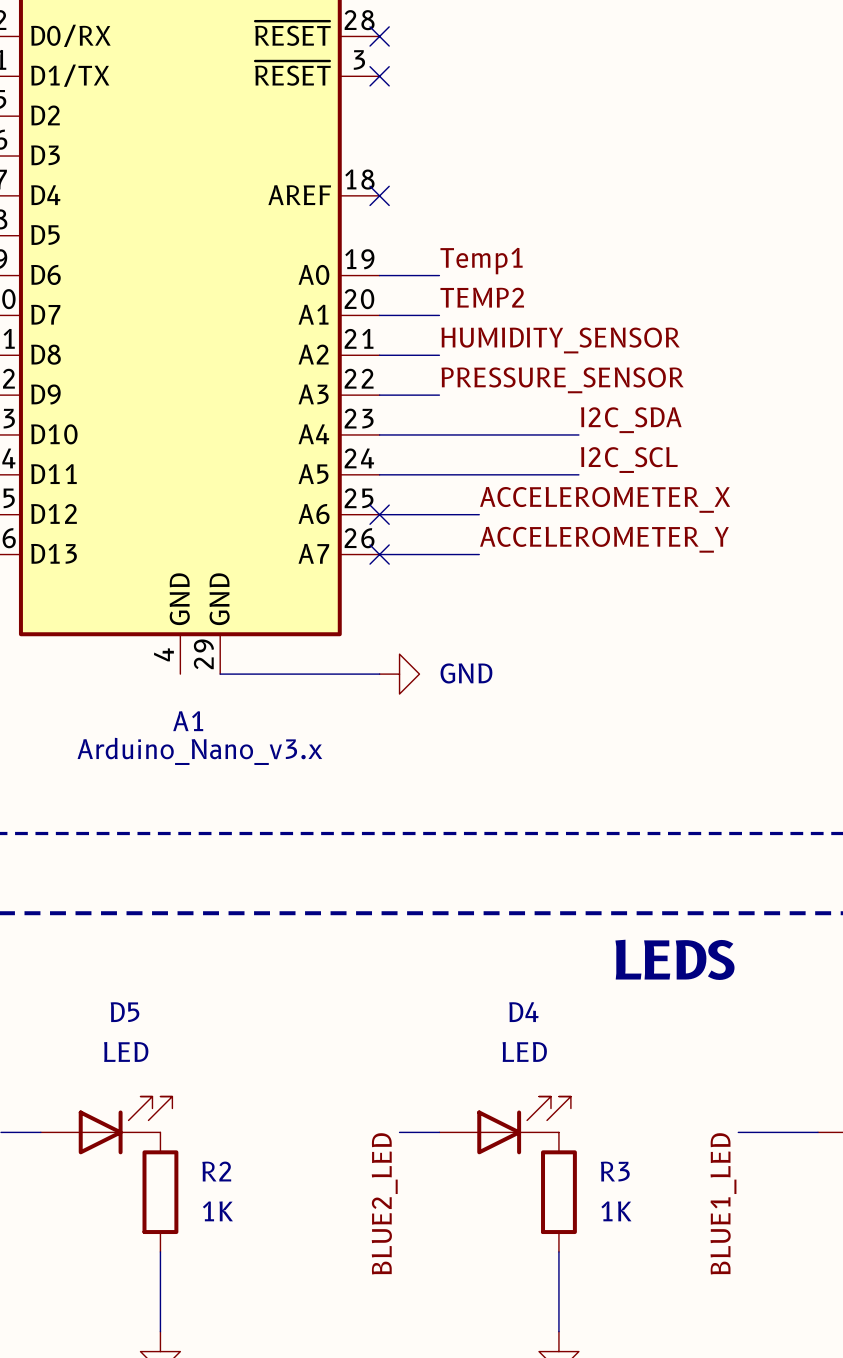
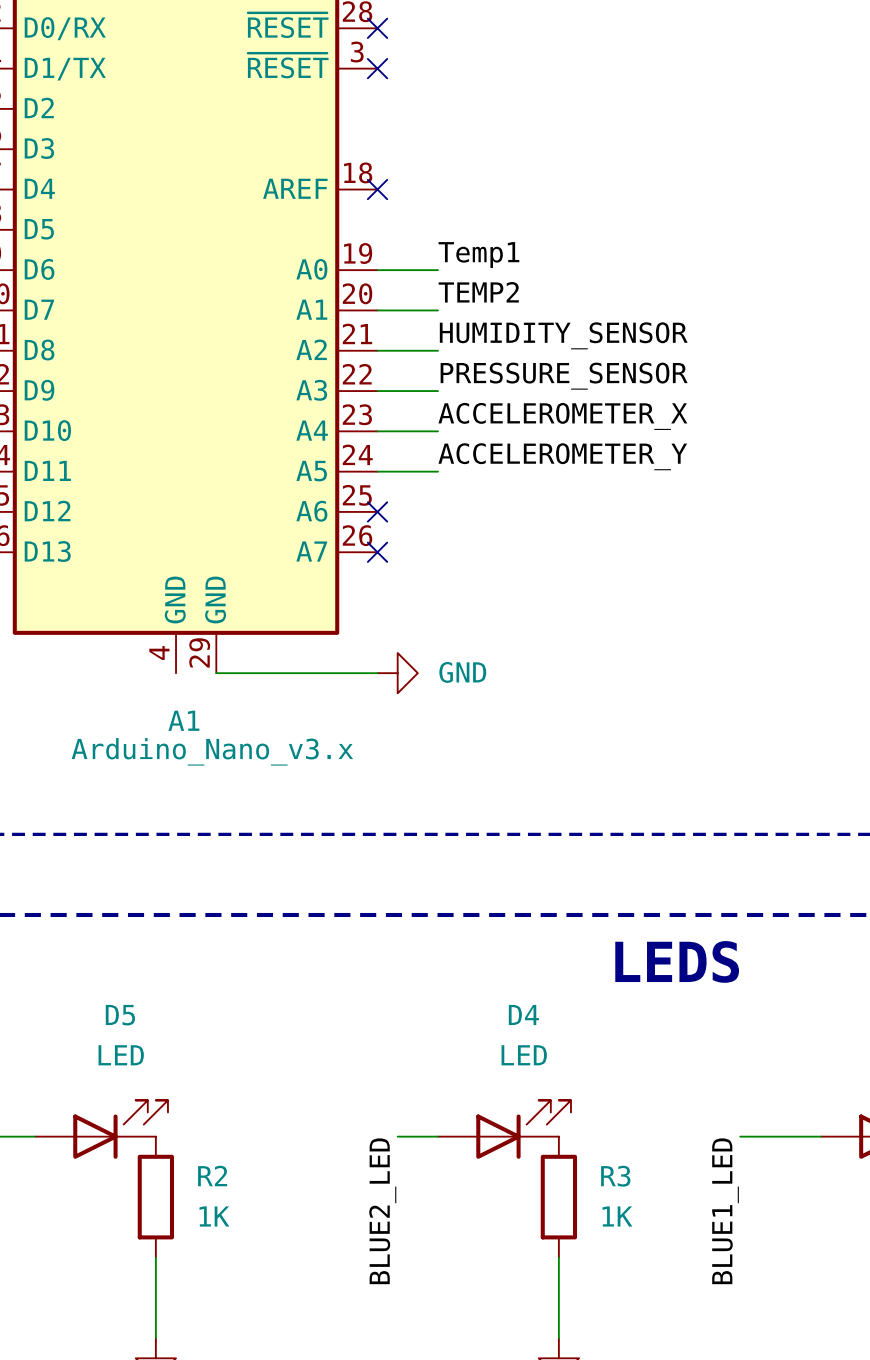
label: I2C_SDA (631, 420) -> none
wire: (439, 434) (578, 434) -> none
label: I2C_SCL (629, 460) -> none
wire: (439, 474) (578, 474) -> none
label position: ACCELEROMETER_X (605, 499) -> ACCELEROMETER_X (562, 416)
wire: (379, 514) (479, 514) -> none
label position: ACCELEROMETER_Y (604, 539) -> ACCELEROMETER_Y (562, 456)
wire: (379, 554) (479, 554) -> none

